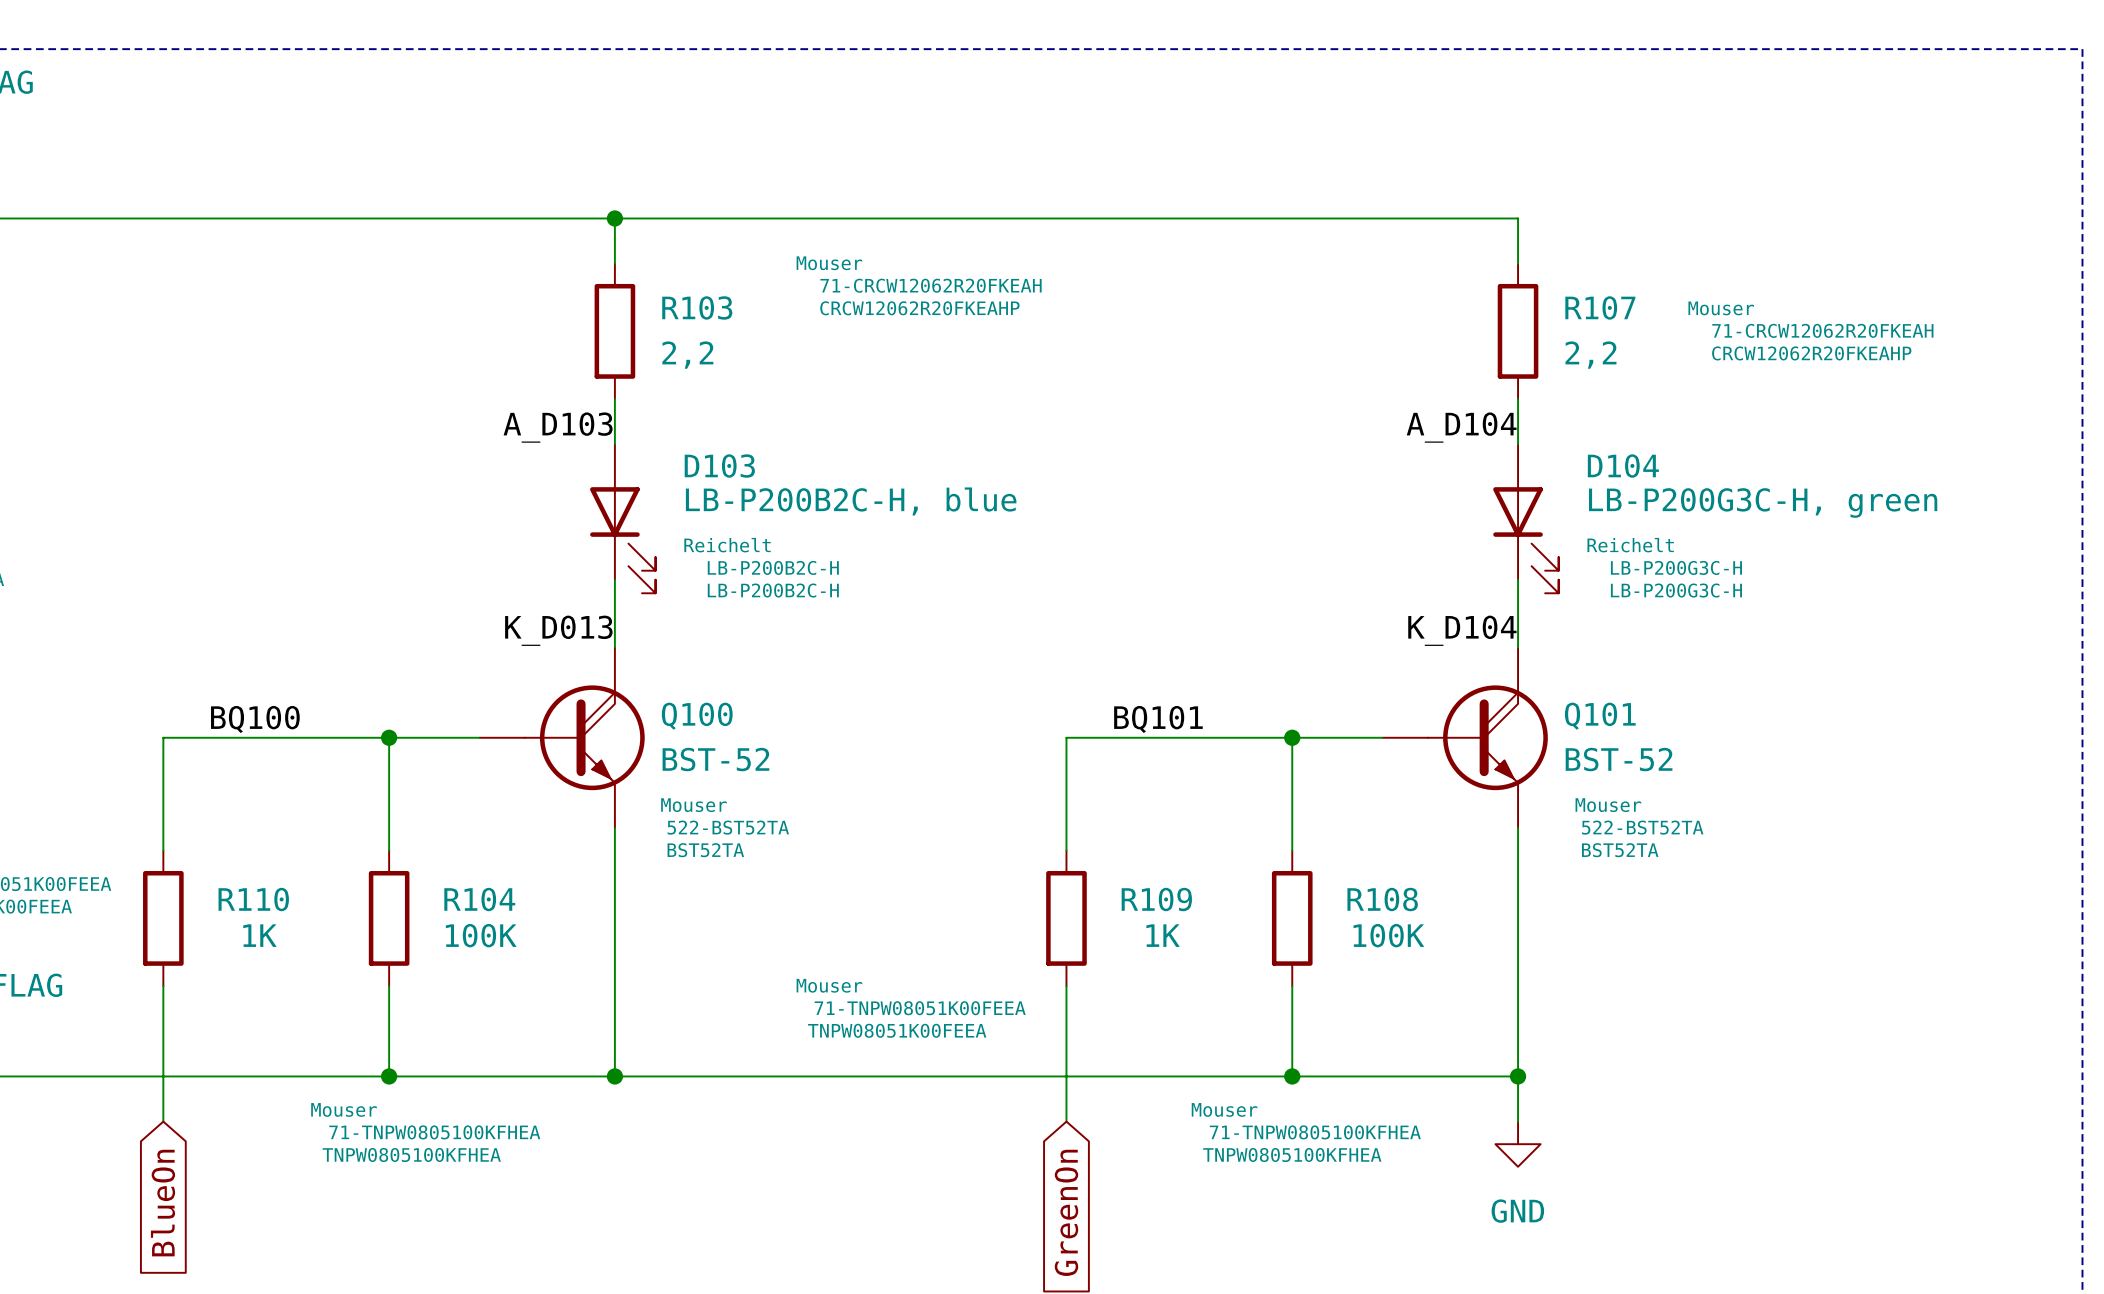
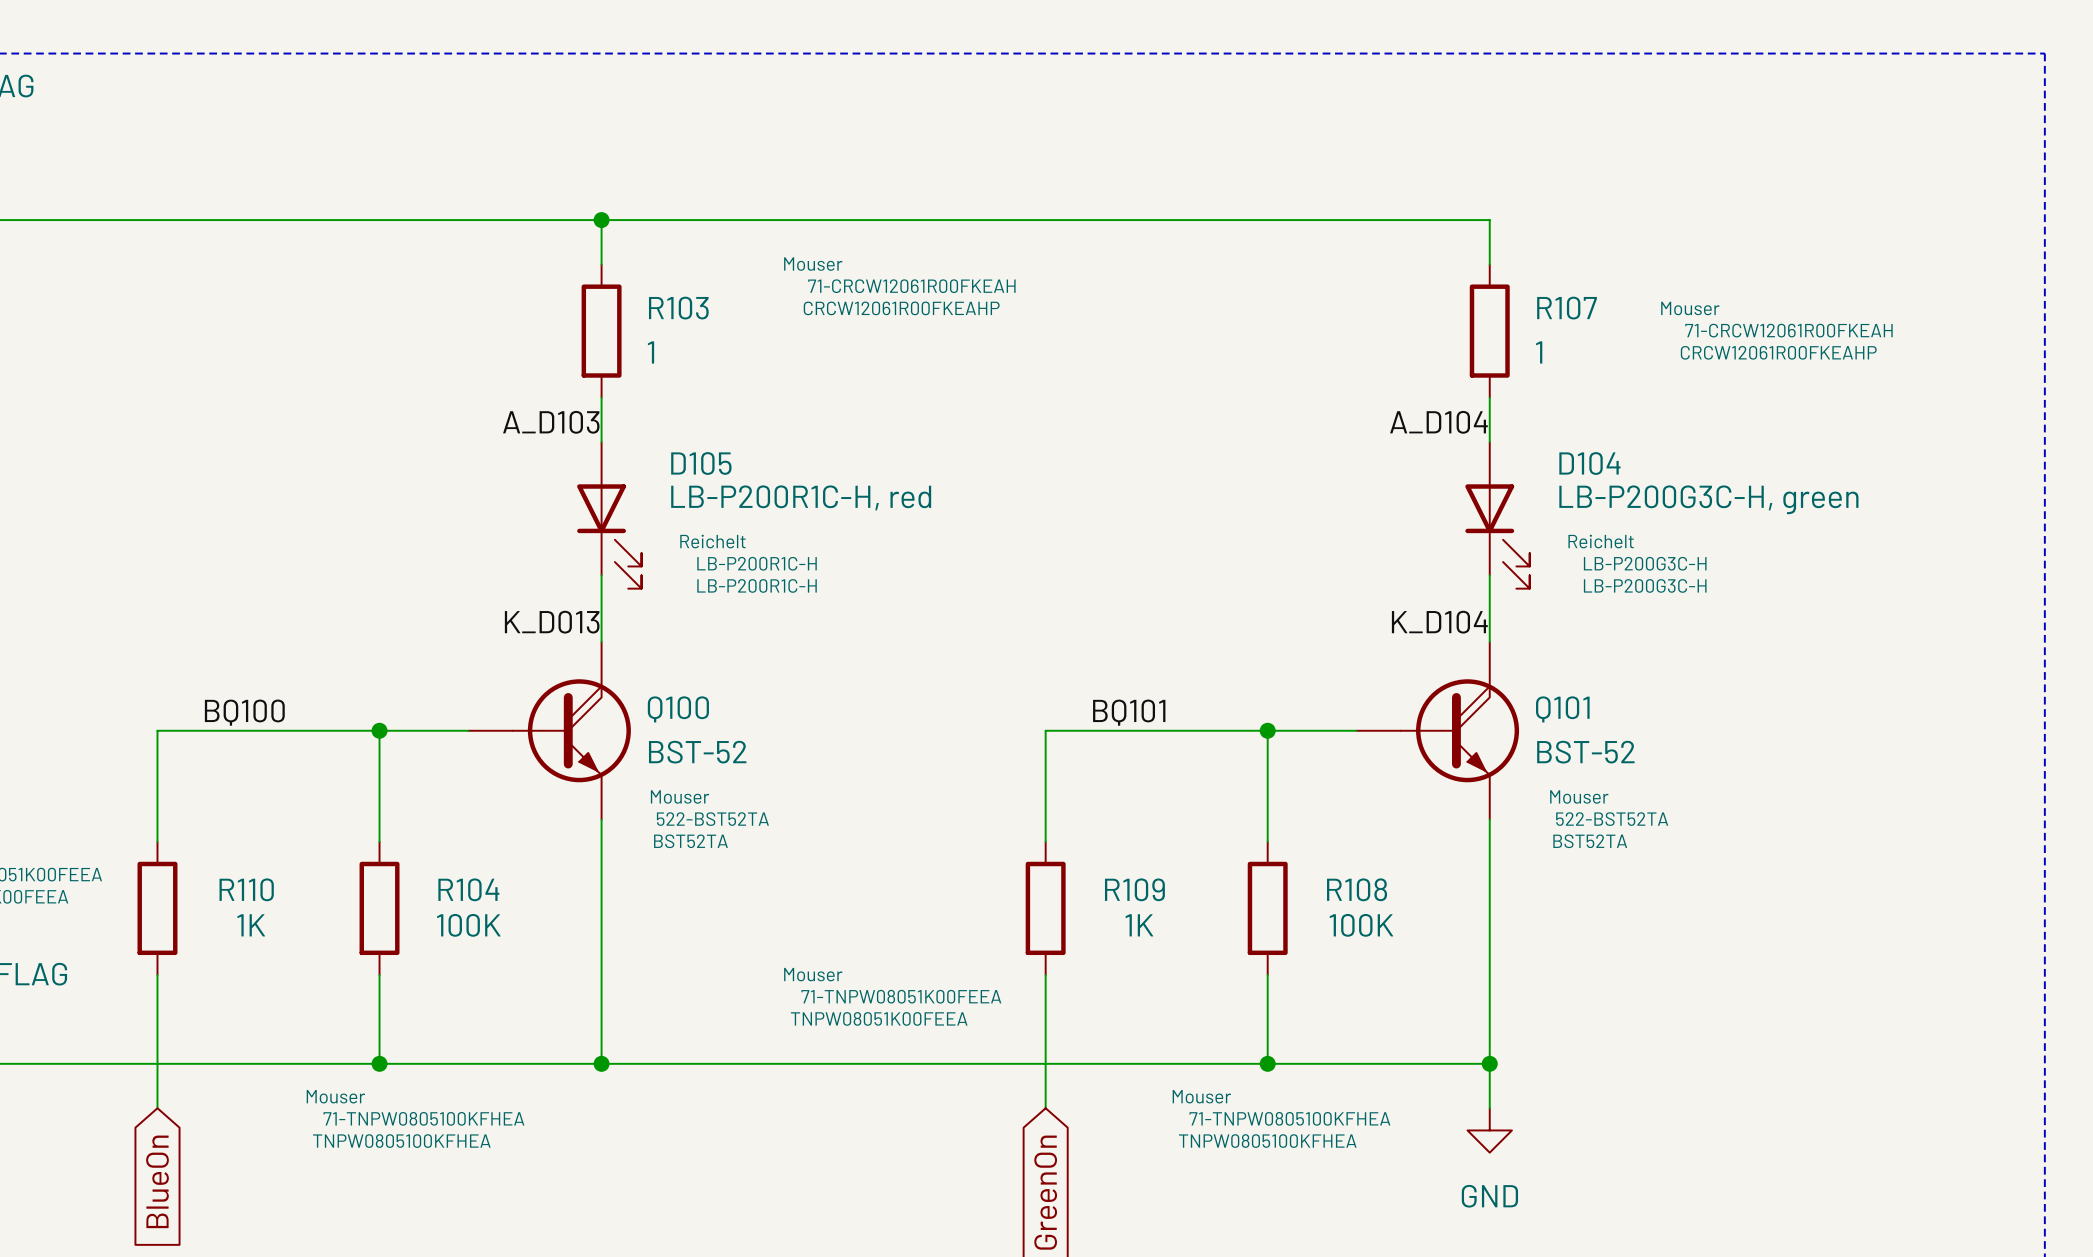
R103 text: 71-CRCW12062R20FKEAH (931, 285) -> 71-CRCW12061R00FKEAH (911, 286)
R103 text: CRCW12062R20FKEAHP (919, 308) -> CRCW12061R00FKEAHP (901, 308)
R107 text: 71-CRCW12062R20FKEAH (1822, 330) -> 71-CRCW12061R00FKEAH (1788, 330)
R107 text: CRCW12062R20FKEAHP (1811, 353) -> CRCW12061R00FKEAHP (1778, 352)
R103 value: 2,2 (687, 355) -> 1 (650, 352)
R107 value: 2,2 (1590, 355) -> 1 (1539, 352)
D103 name: D103 (719, 466) -> D105 (701, 463)
D103 value: LB-P200B2C-H, blue (851, 501) -> LB-P200R1C-H, red (801, 497)
D103 text: LB-P200B2C-H (773, 567) -> LB-P200R1C-H (757, 563)
D103 text: LB-P200B2C-H (773, 590) -> LB-P200R1C-H (757, 585)

